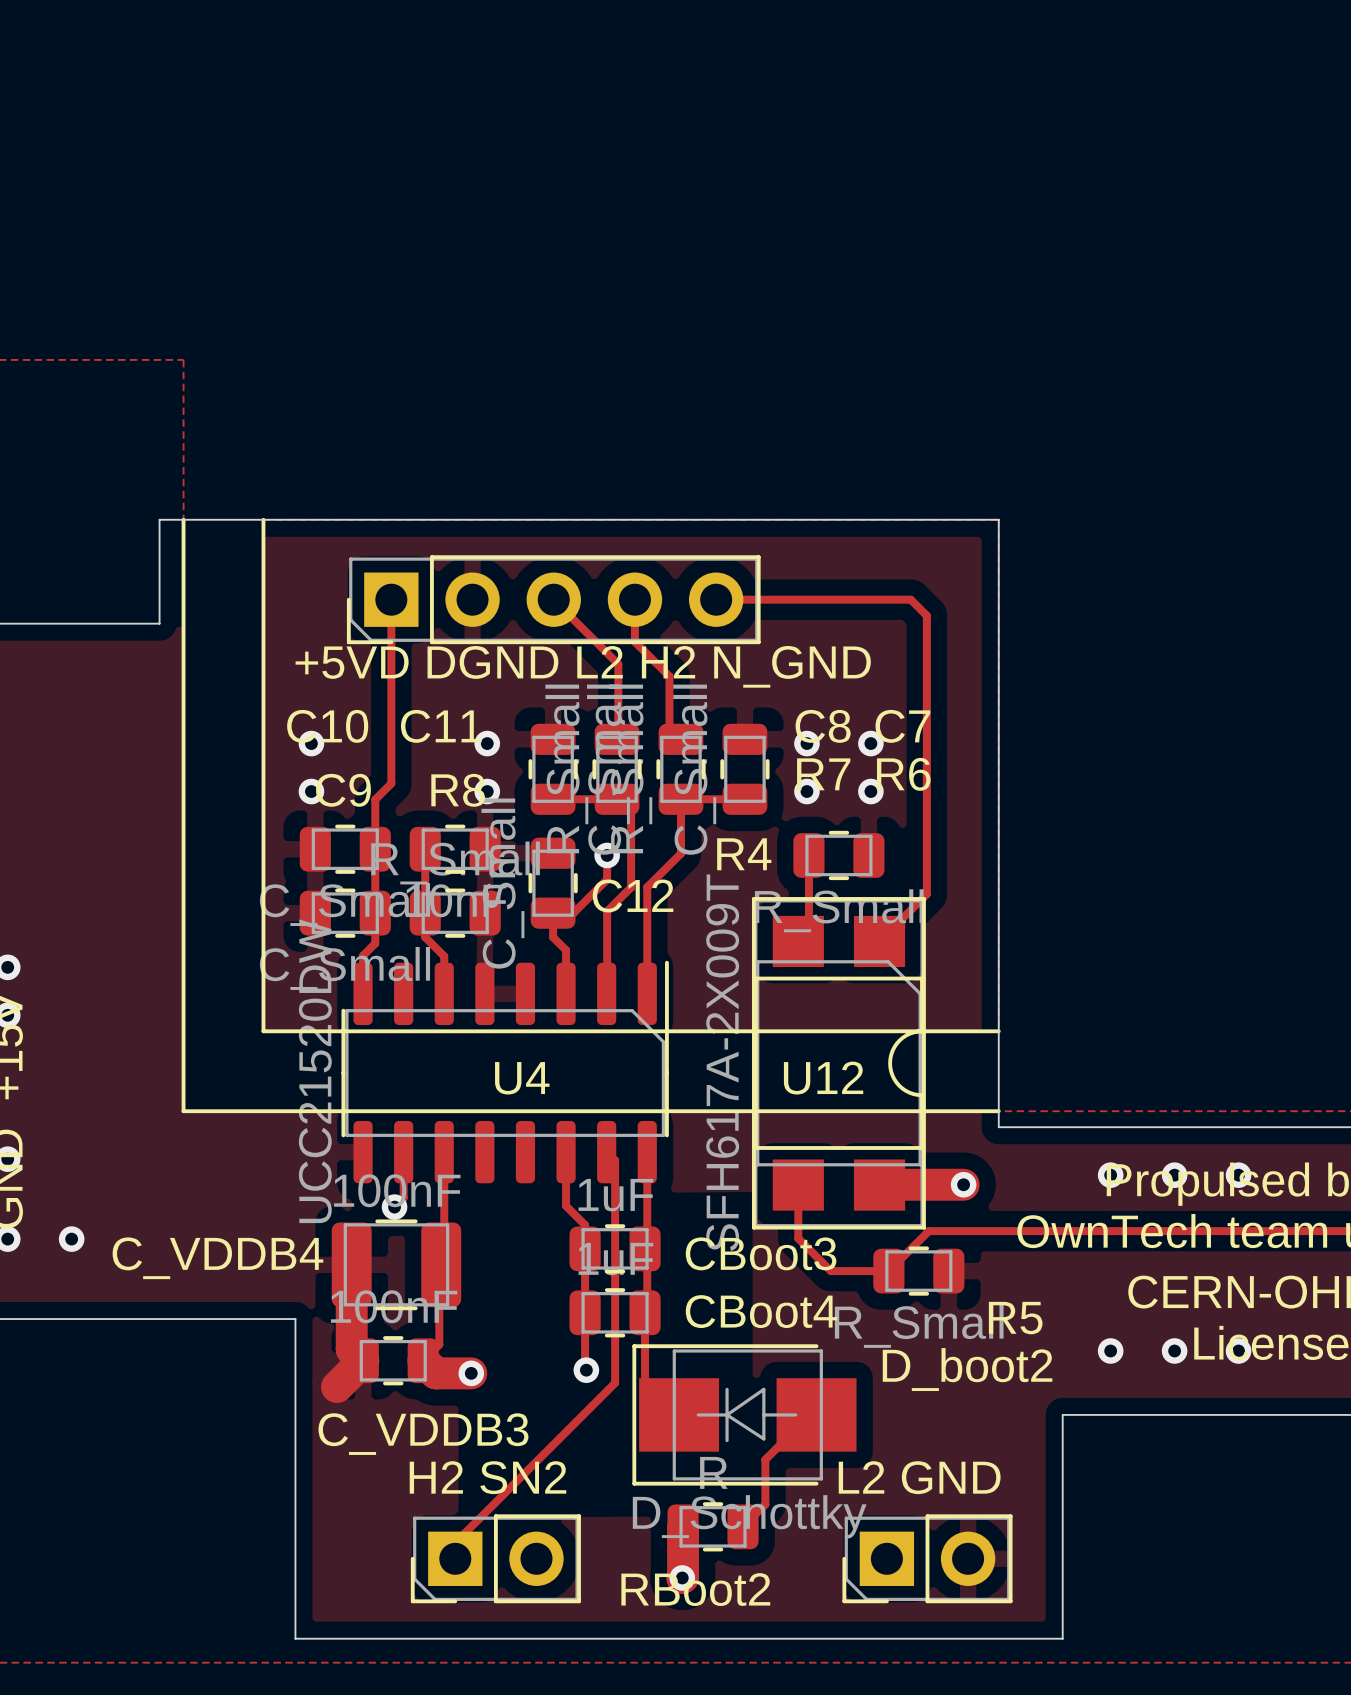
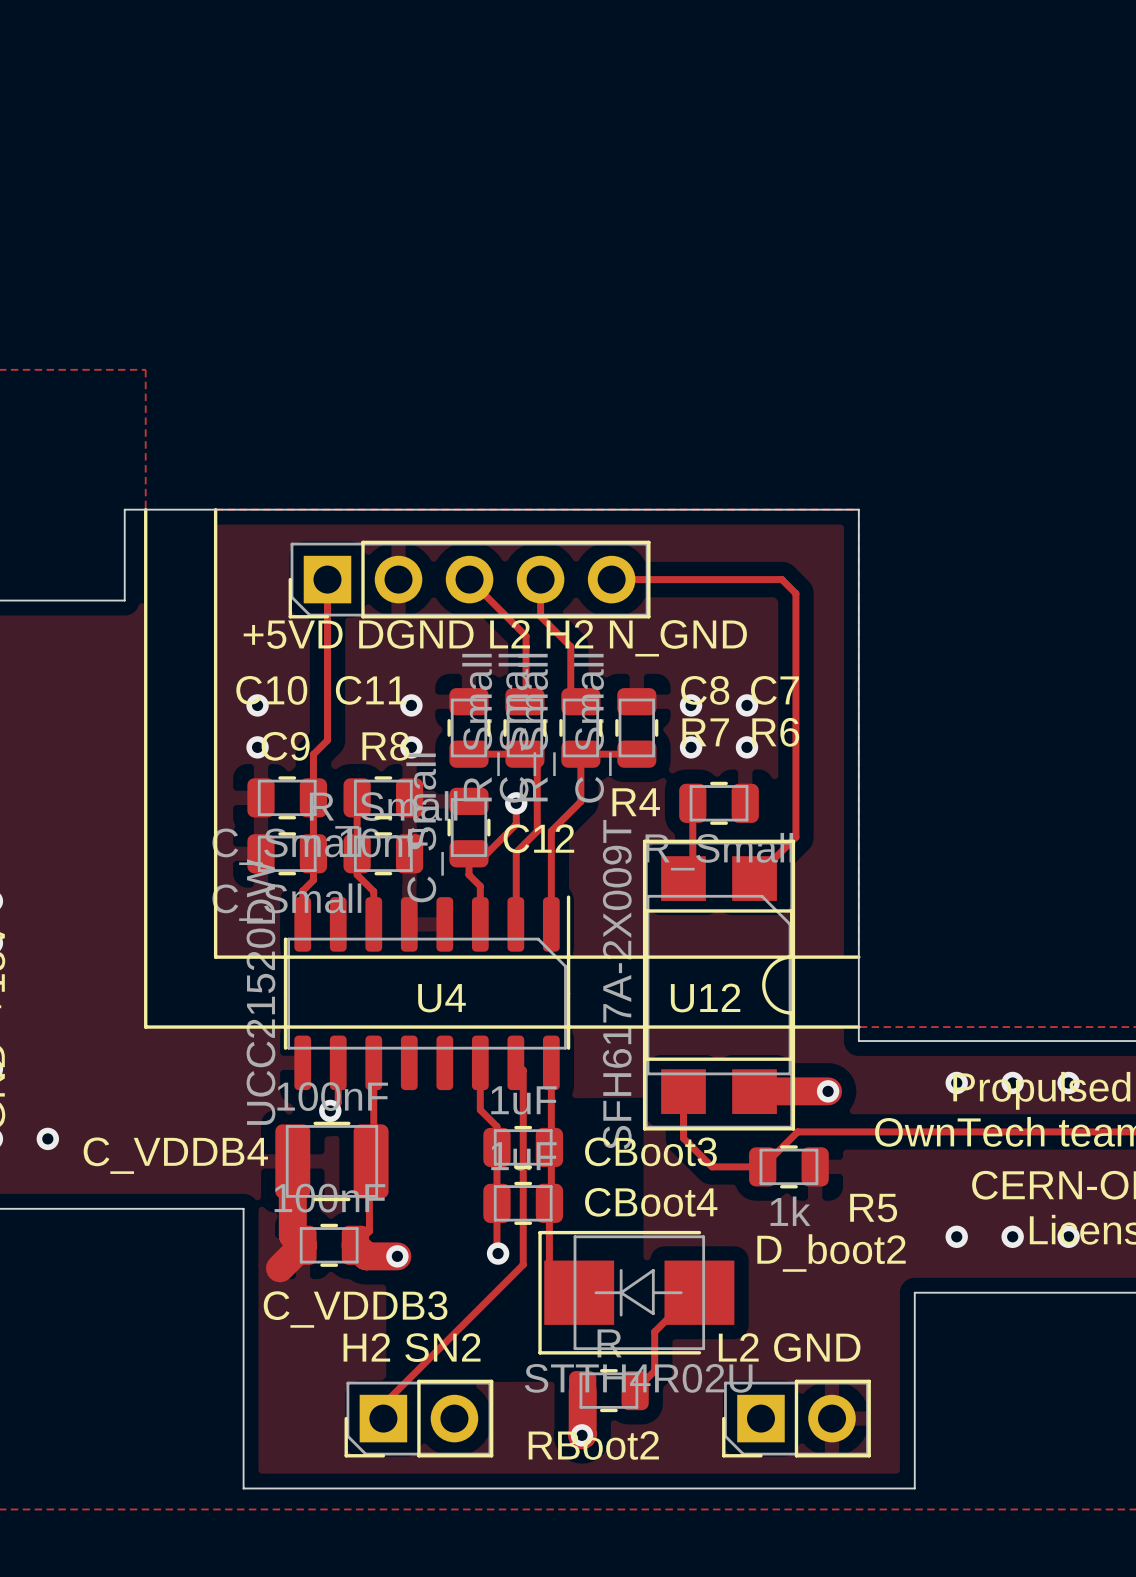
R5 value: R_Small (919, 1326) -> 1k (790, 1211)
D_boot2 value: D_Schottky (749, 1516) -> STTH4R02U (638, 1378)

